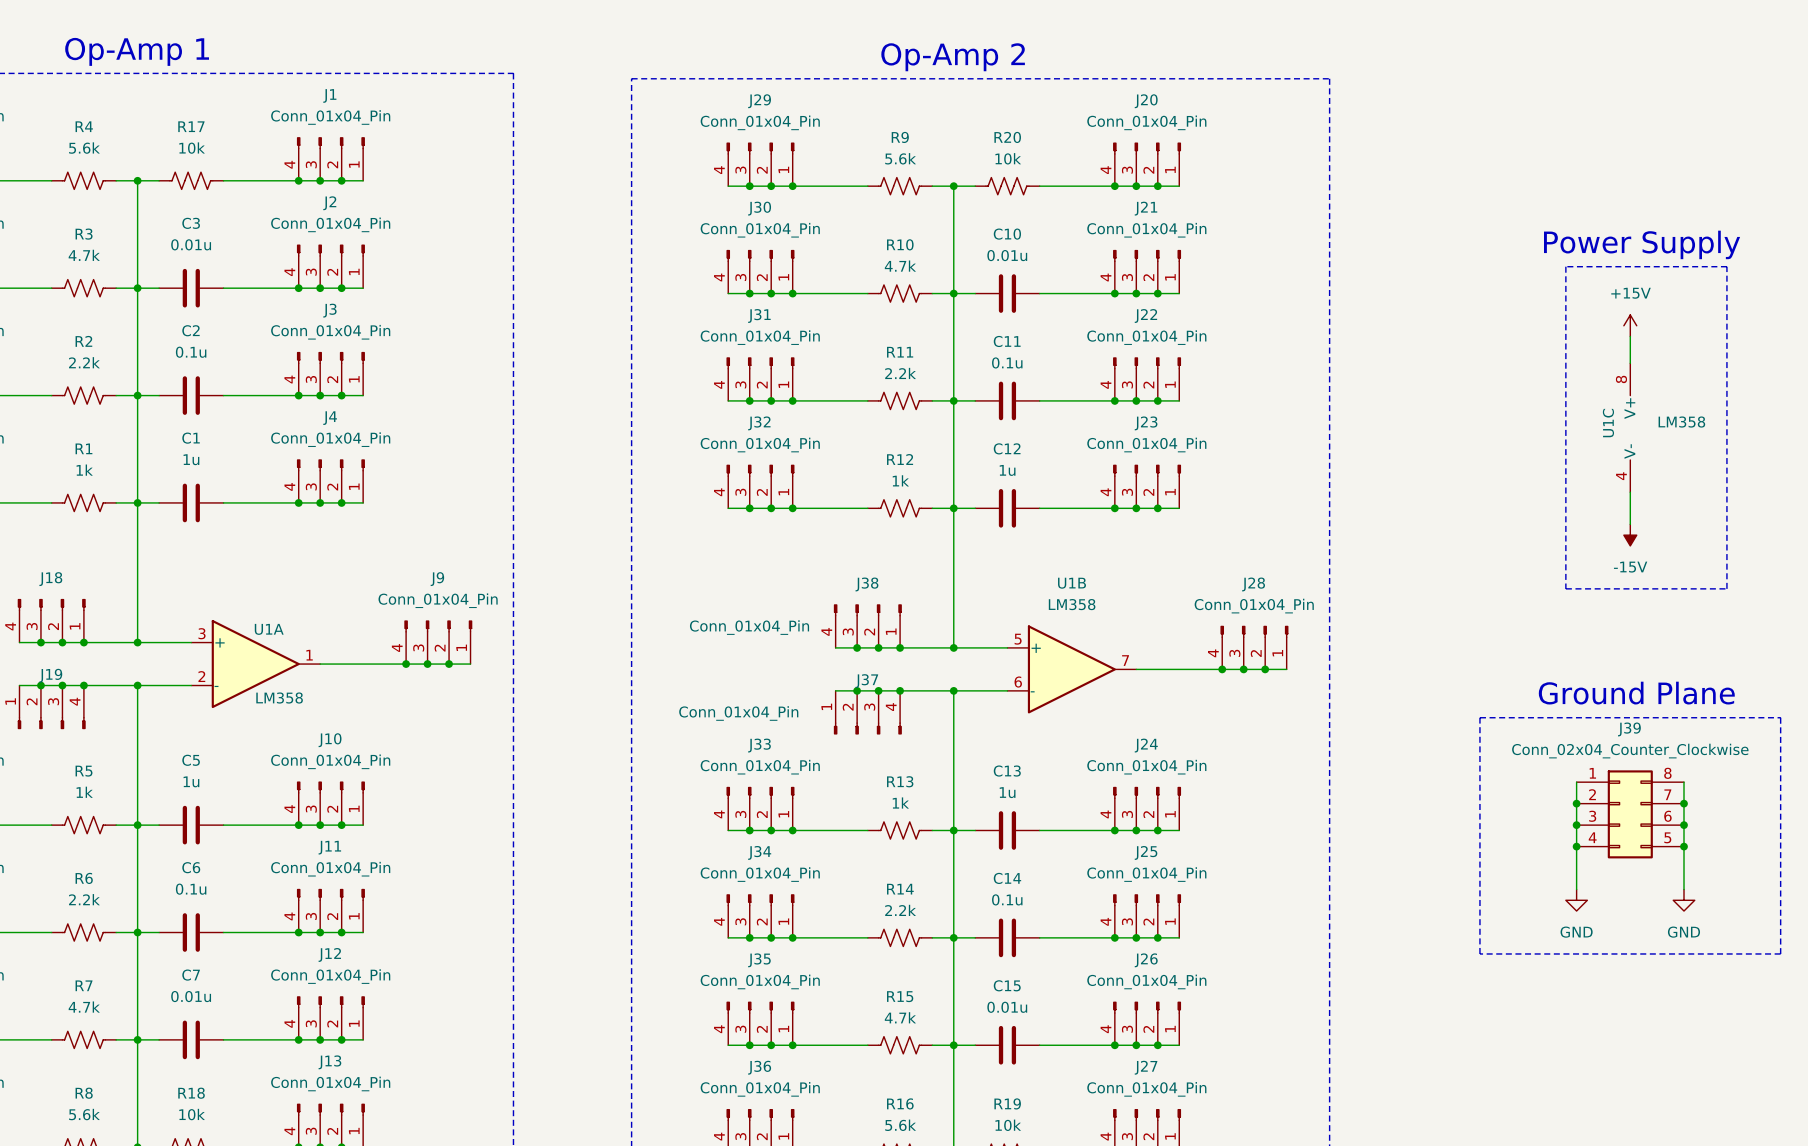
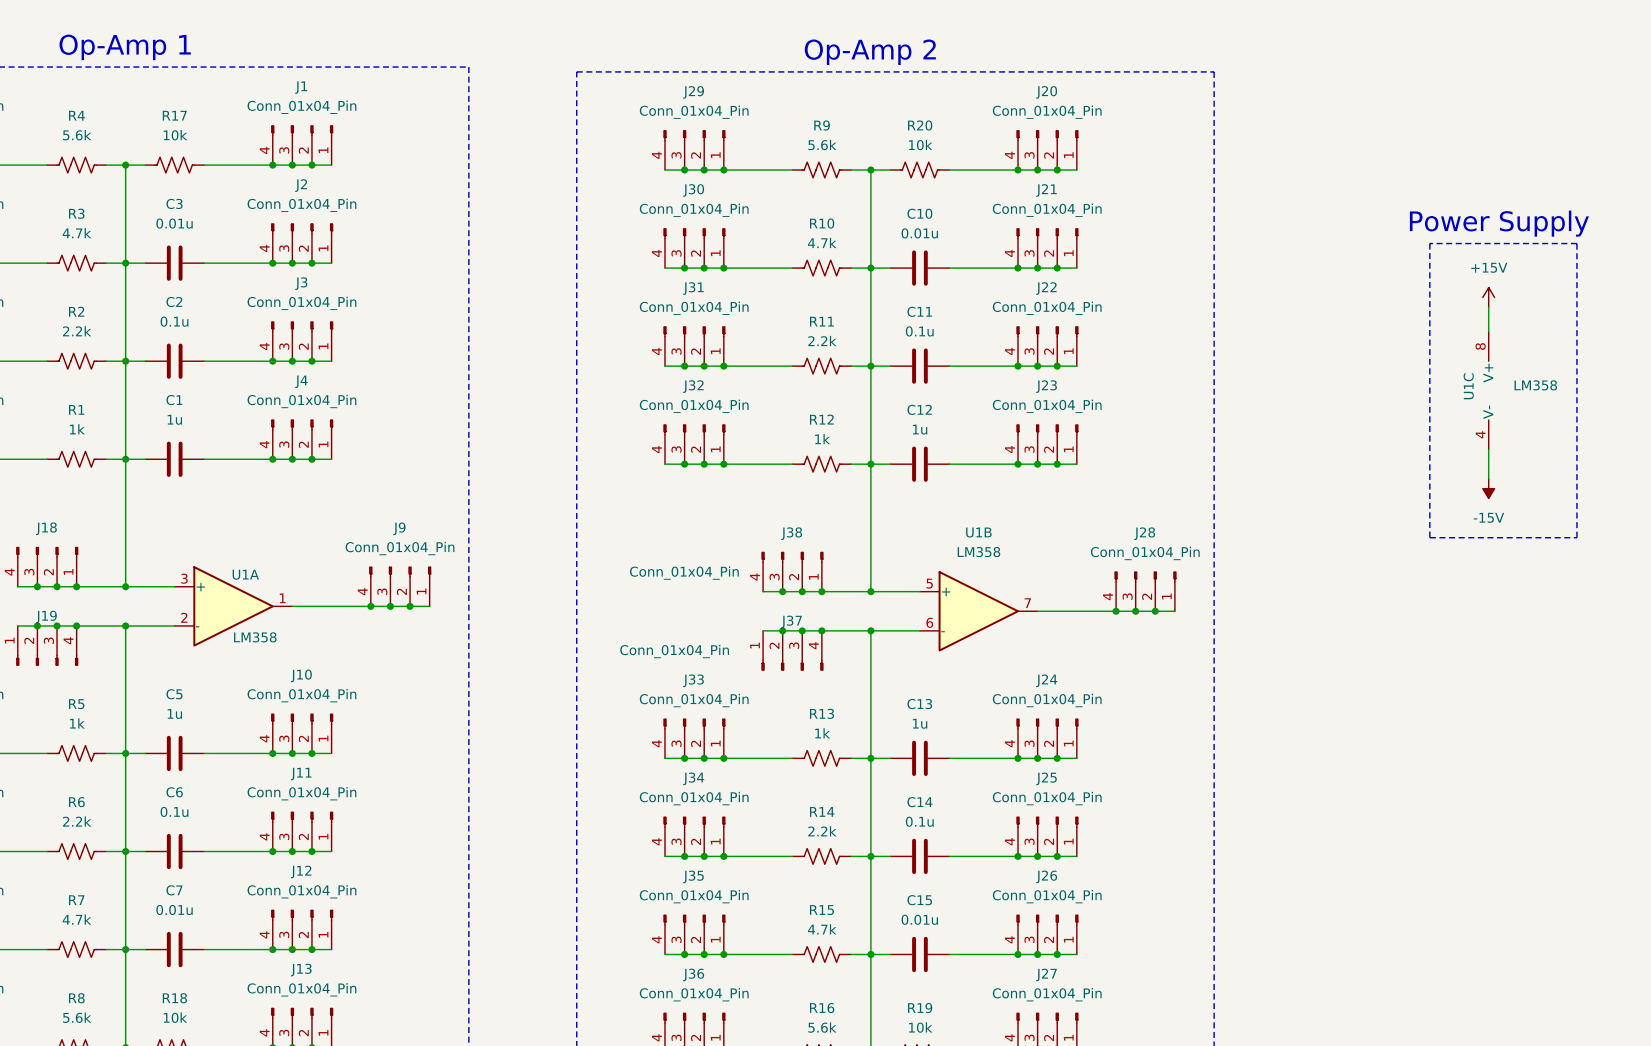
text: Ground Plane (1636, 693) -> none
line: (1479, 717) (1780, 717) (1780, 953) (1479, 953) (1479, 717) -> none
wire: (1576, 782) (1576, 889) -> none
wire: (1684, 782) (1684, 889) -> none
junction: (1576, 803) -> none
junction: (1684, 803) -> none
J39: Conn_02x04_Counter_Clockwise (1630, 814) -> none
junction: (1576, 825) -> none
junction: (1684, 825) -> none
junction: (1576, 846) -> none
junction: (1684, 846) -> none
power symbol: GND (1576, 900) -> none
power symbol: GND (1684, 900) -> none

